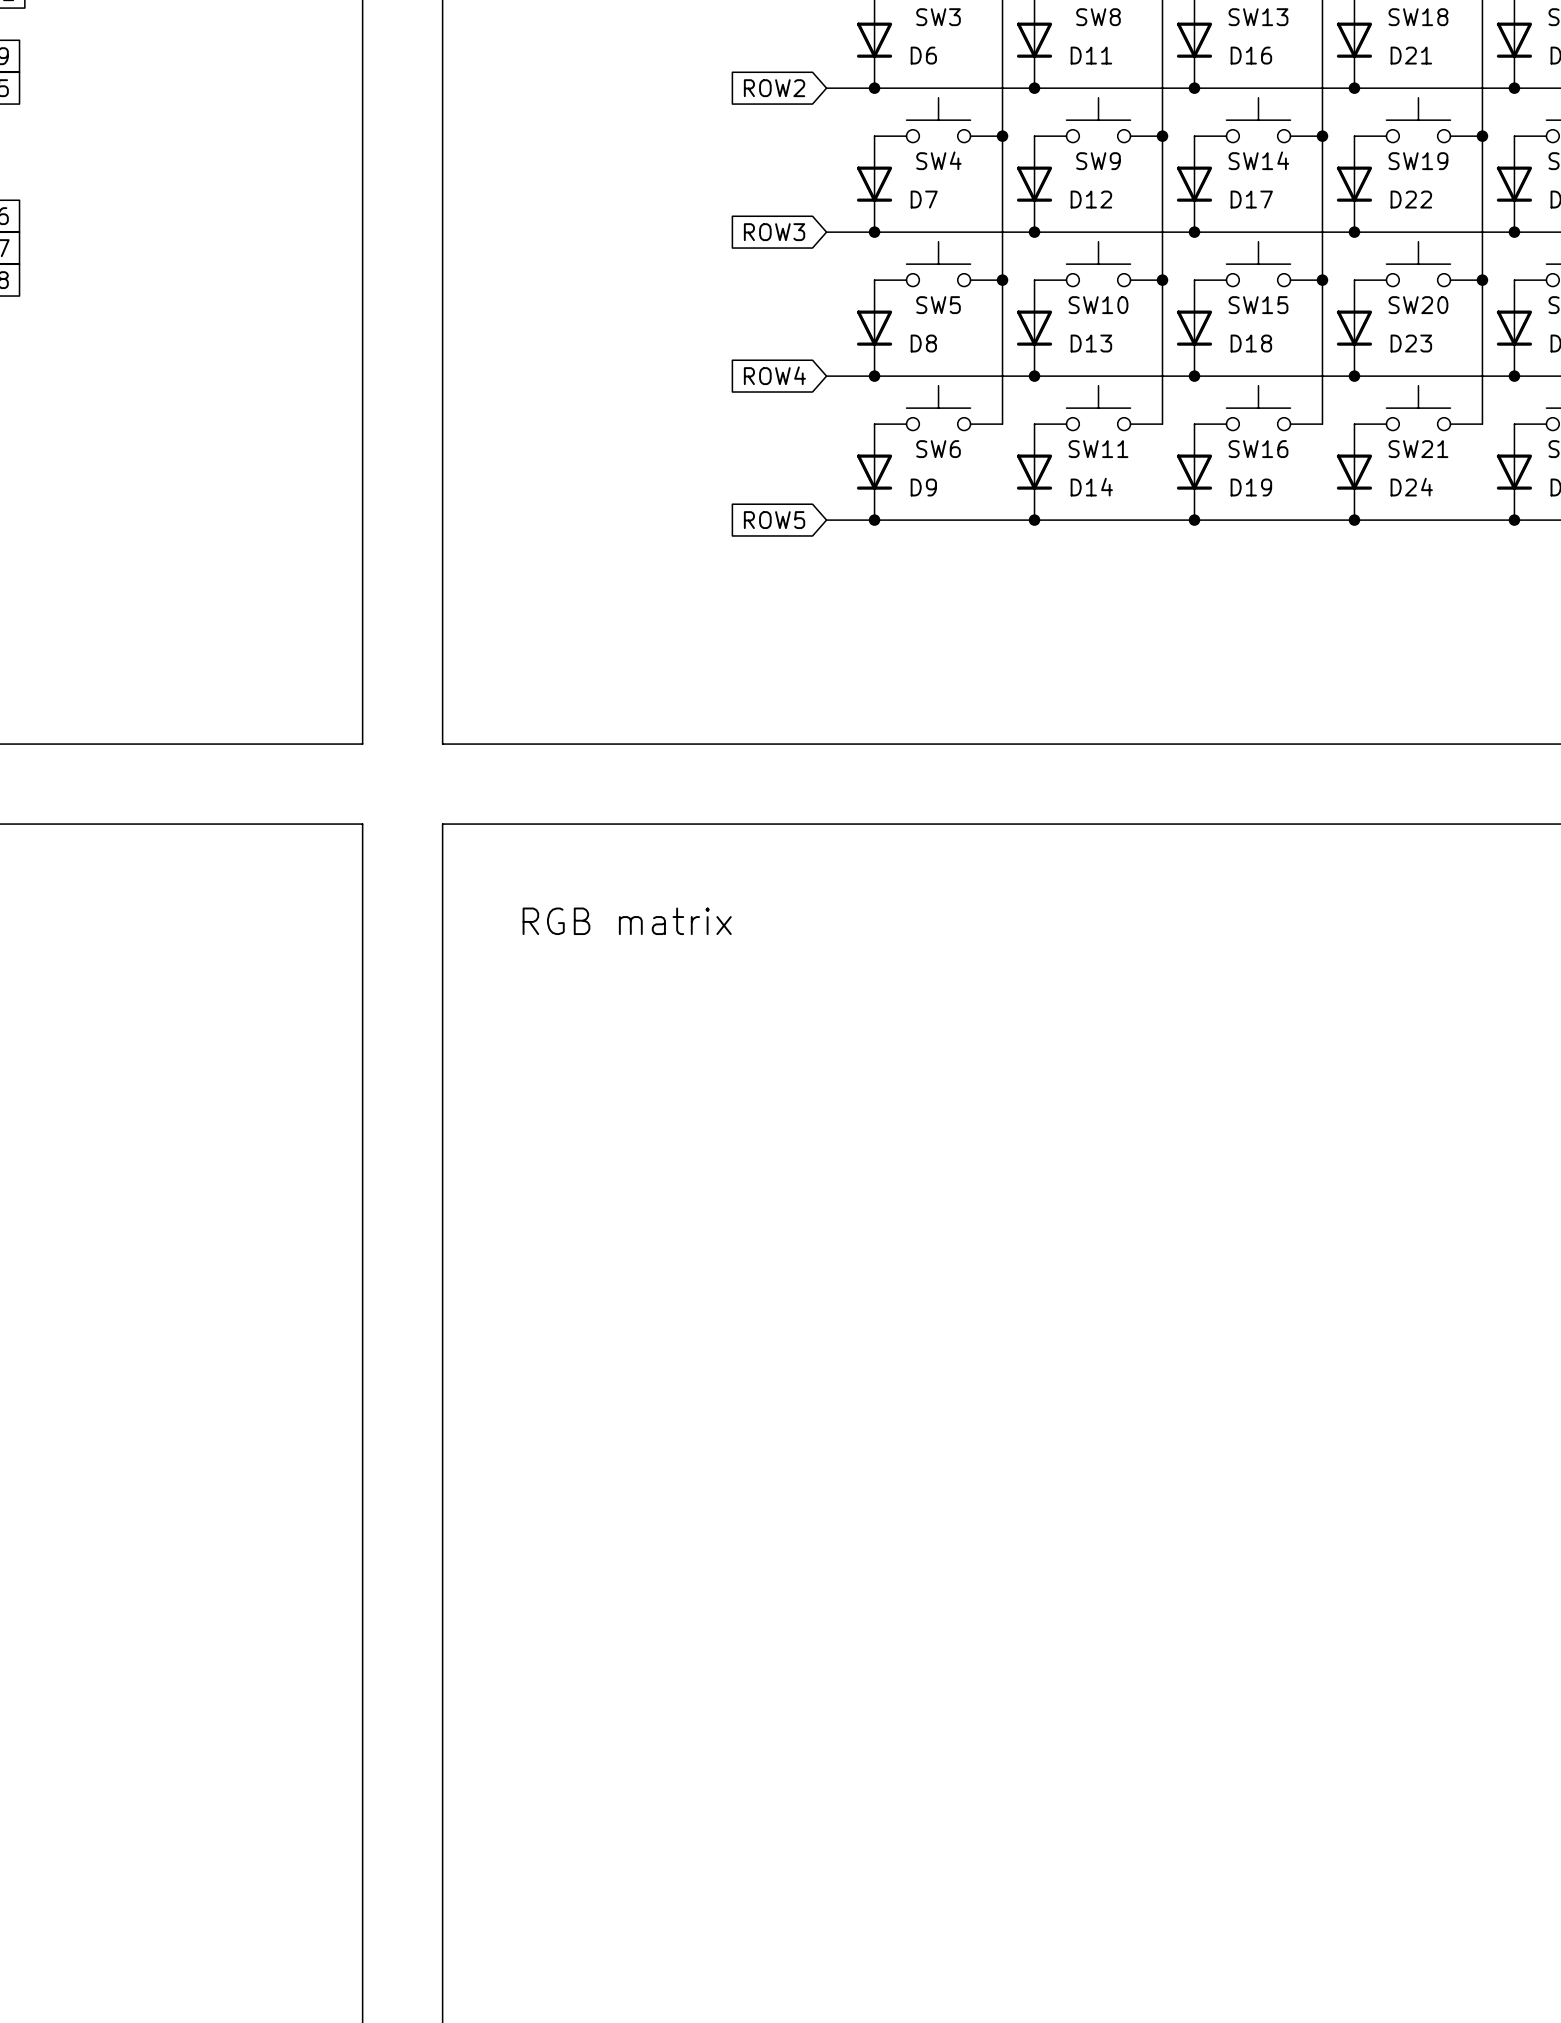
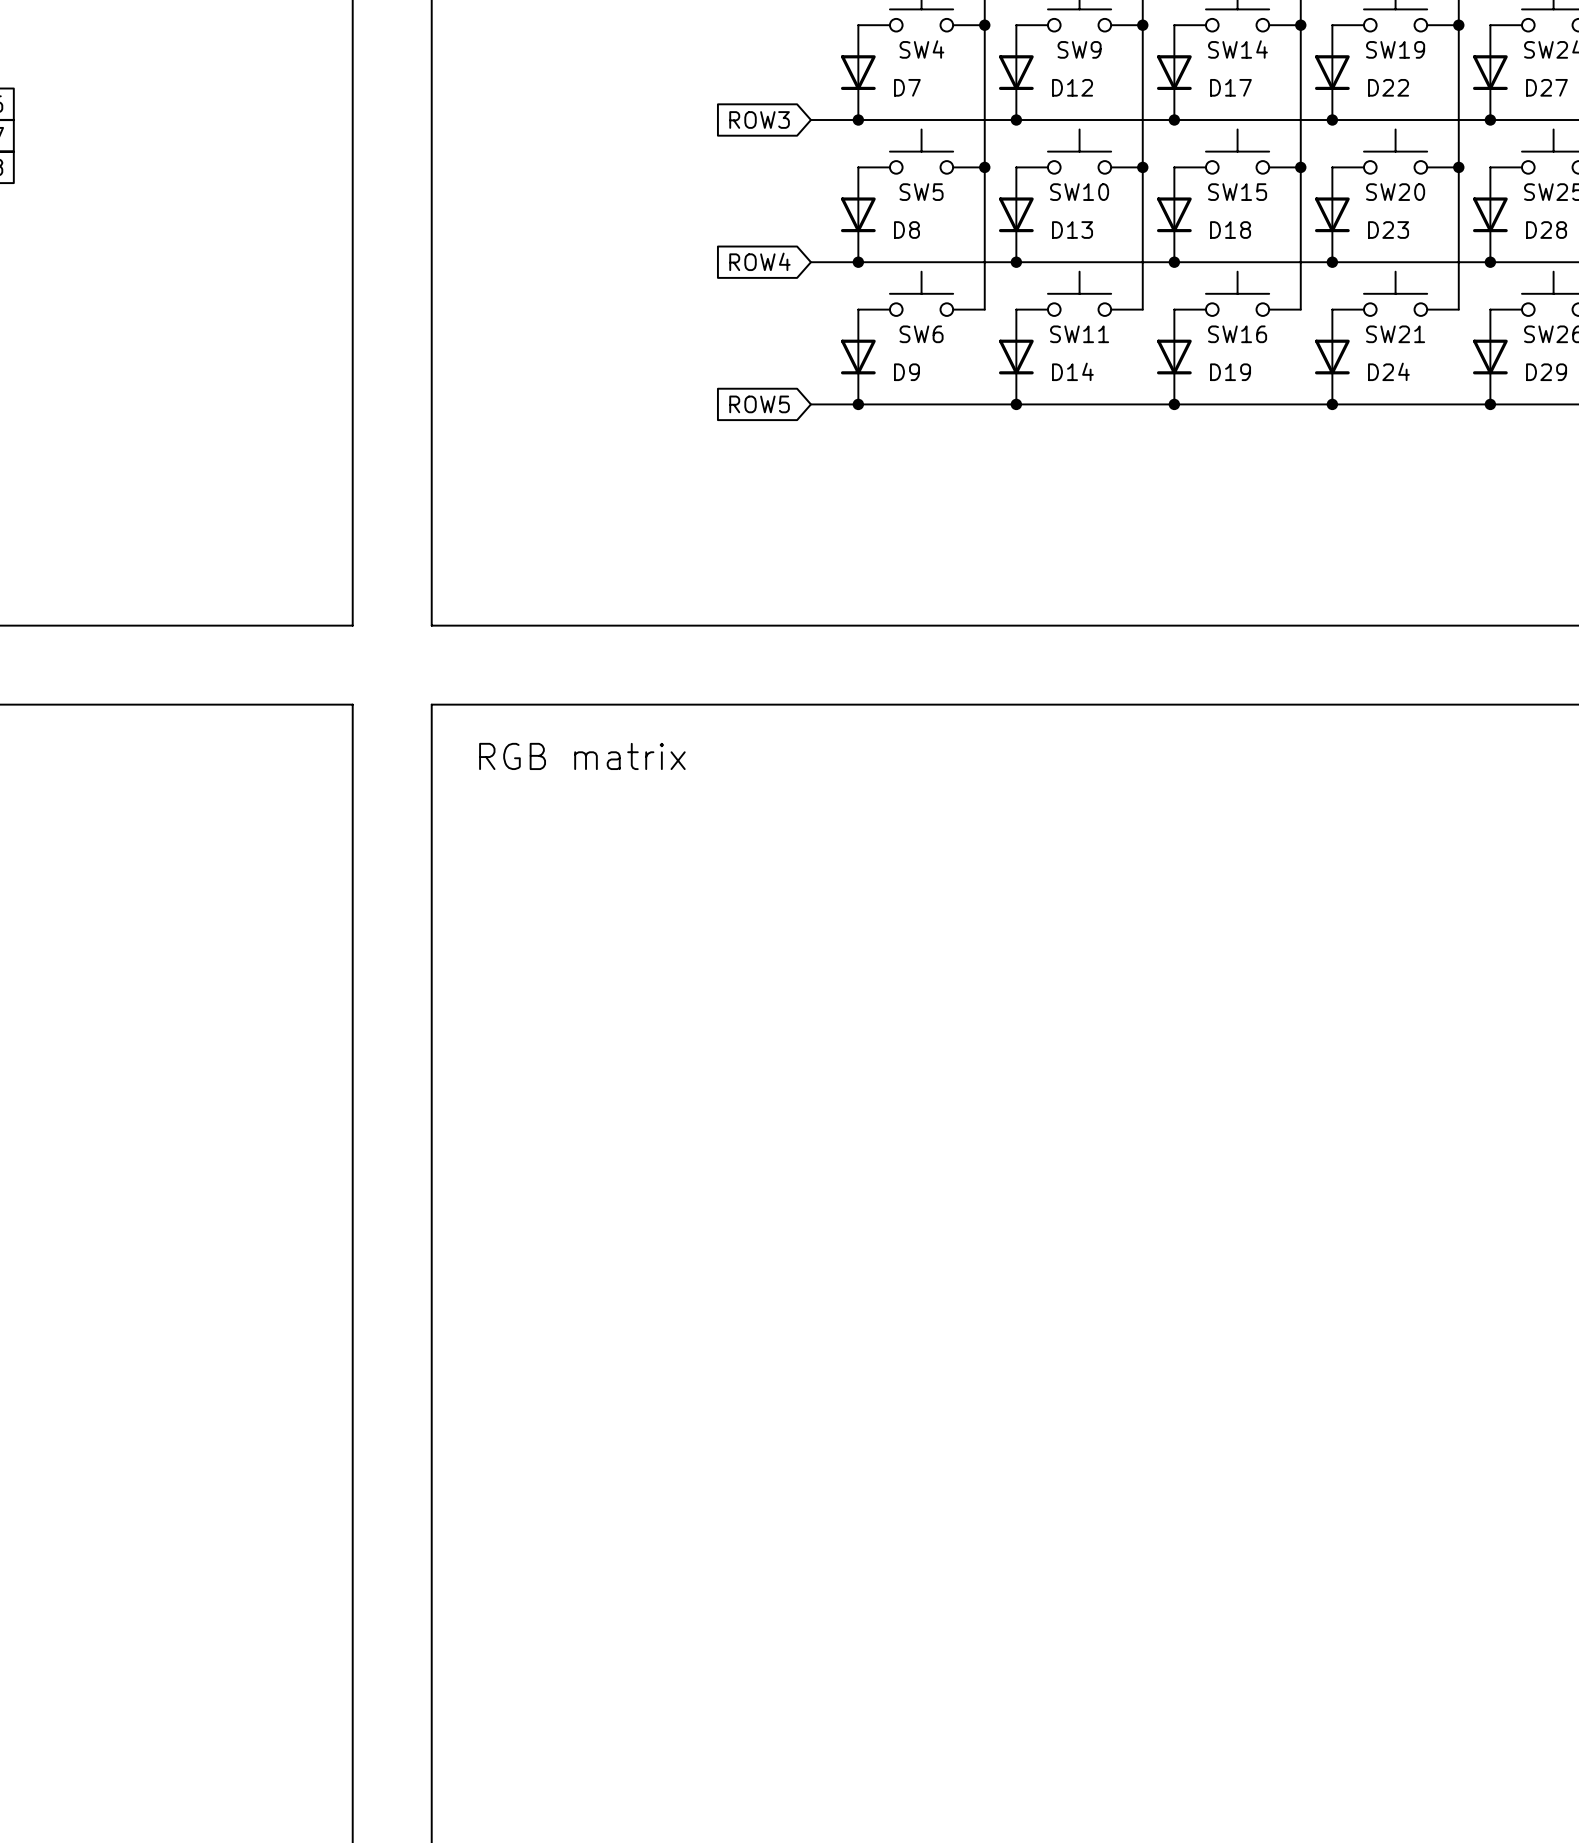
text position: RGB matrix (627, 921) -> RGB matrix (582, 756)

